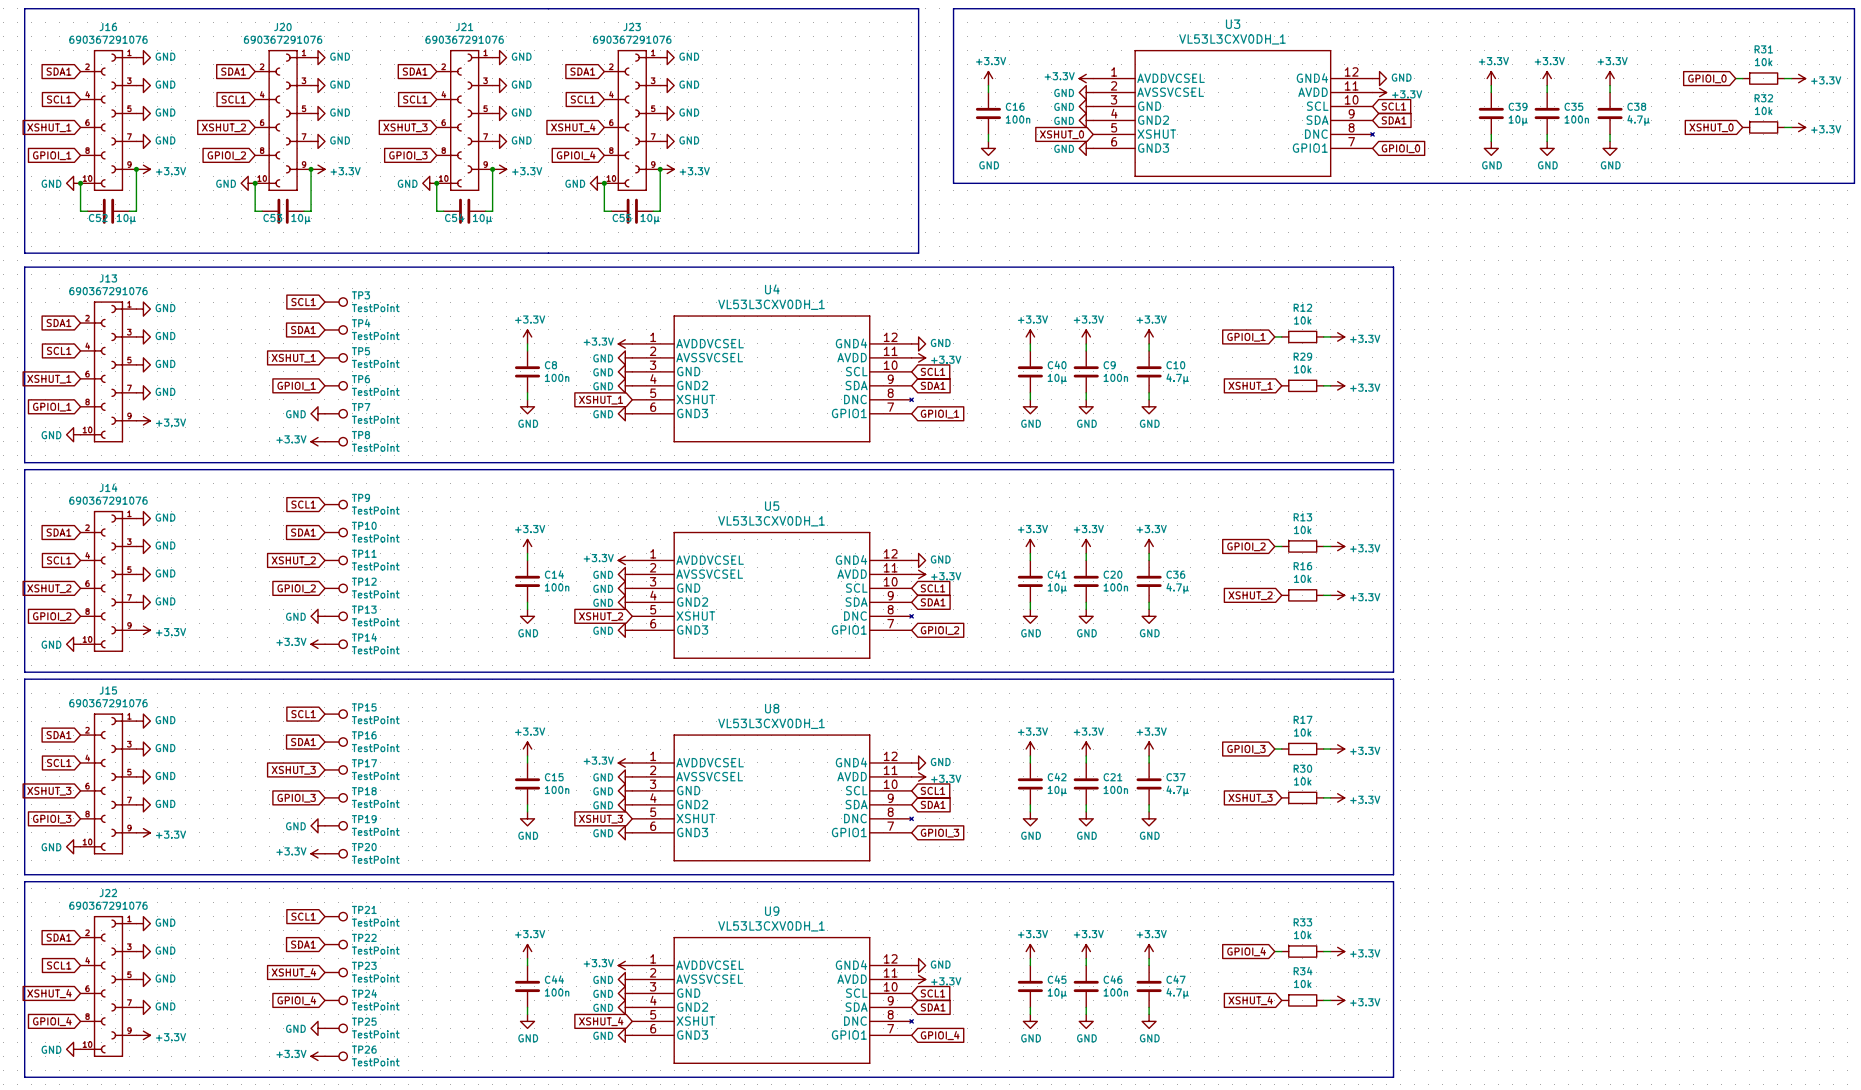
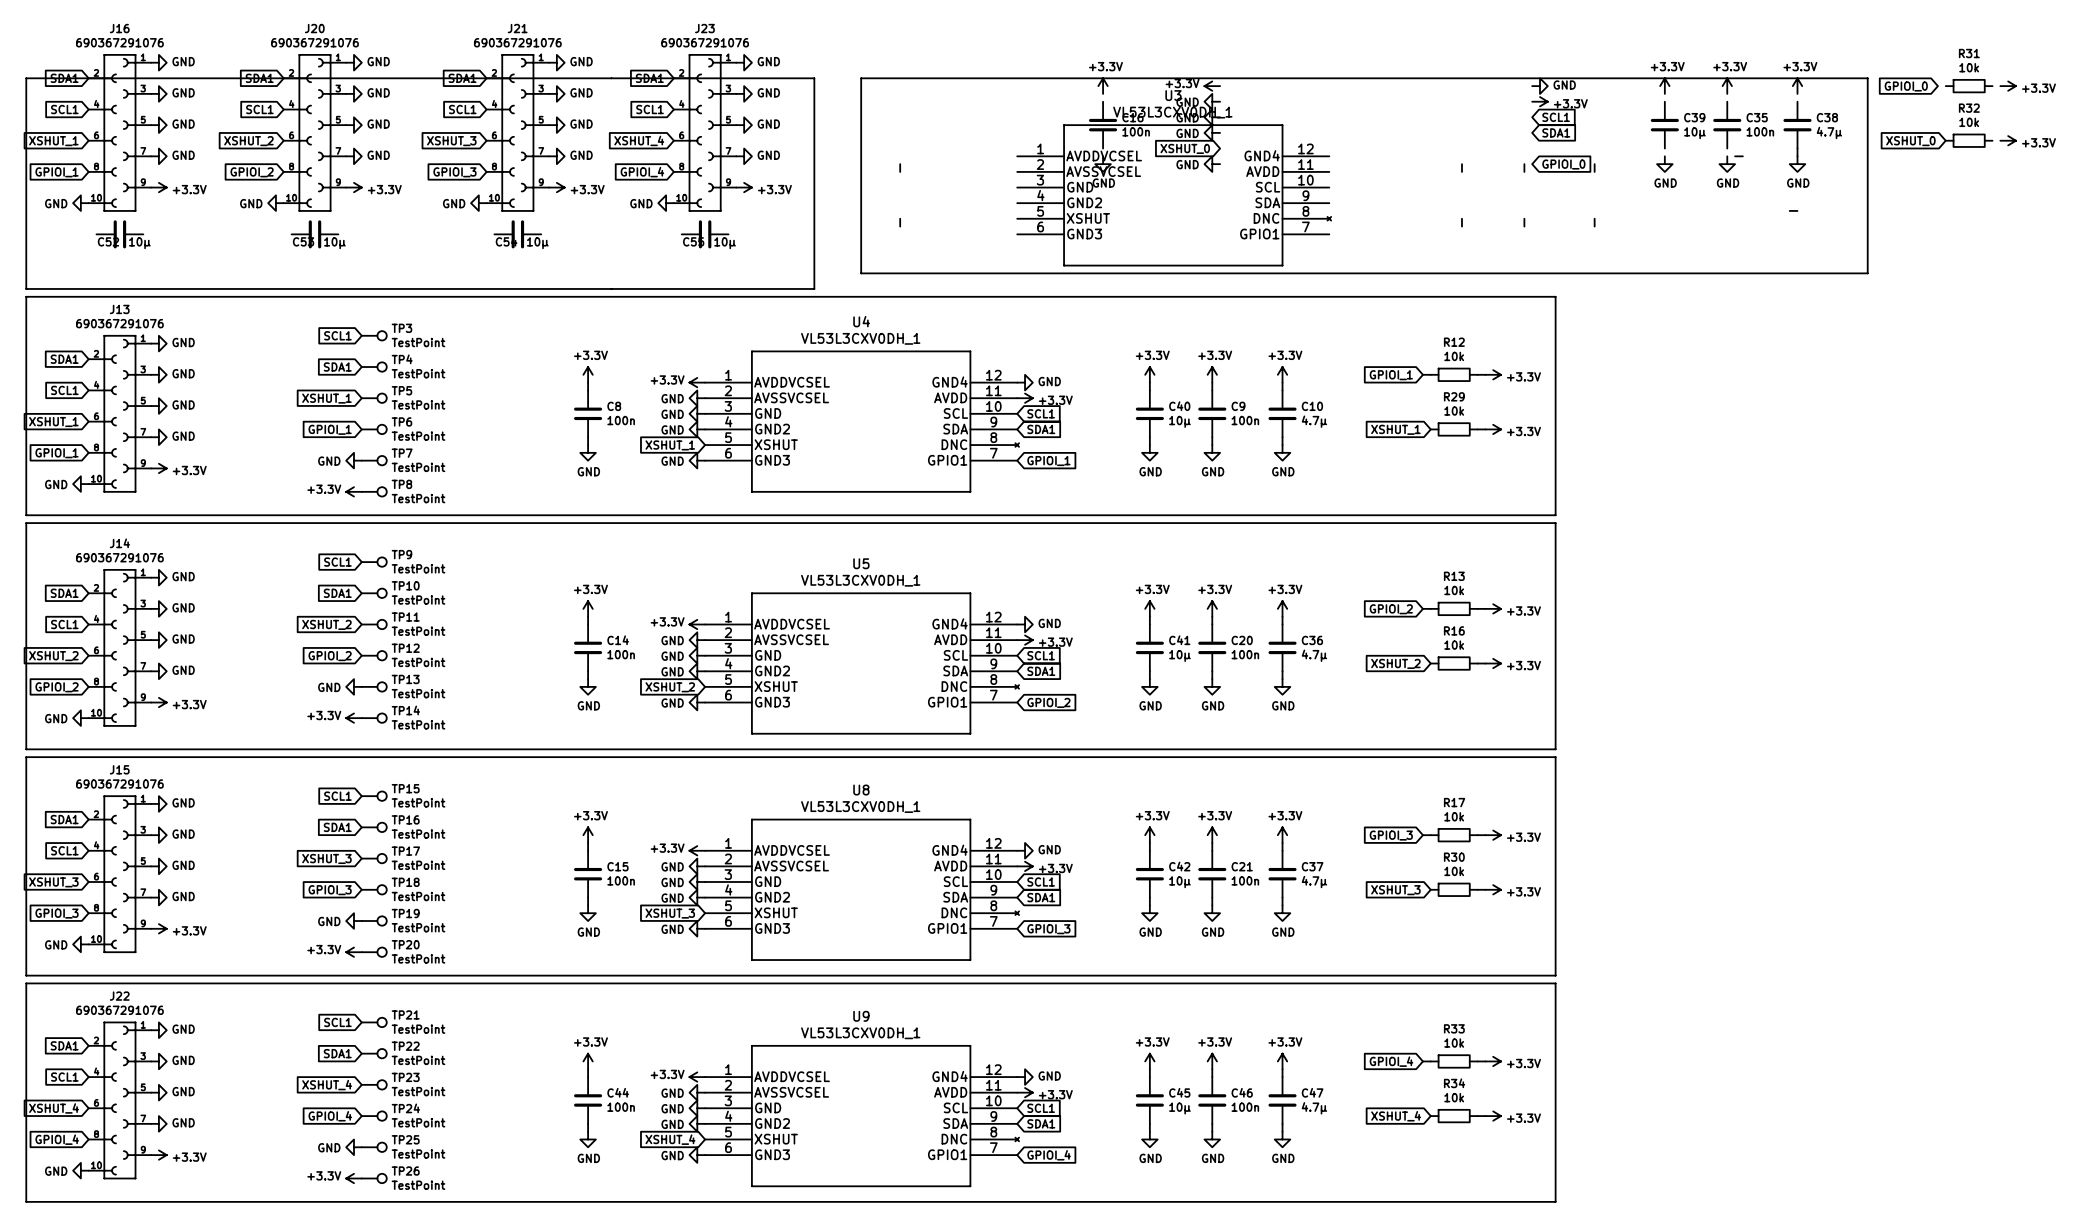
line: (953, 8) (1854, 8) (1854, 183) (953, 183) (953, 8) -> none
line: (24, 71) (24, 8) (918, 8) (918, 253) (24, 253) -> (26, 78) (814, 78) (814, 288) (26, 288) (26, 281)
line: none -> (861, 78) (1867, 78) (1867, 273) (861, 273) (861, 78)
wire: (1735, 78) (1742, 78) -> none
wire: (1784, 78) (1791, 78) -> none
wire: (988, 85) (988, 92) -> none
wire: (1491, 85) (1491, 92) -> (1594, 164) (1594, 171)
wire: (1547, 85) (1547, 92) -> none
wire: (1610, 85) (1610, 92) -> none
U3 position: (1233, 113) -> (1174, 195)
wire: (1784, 127) (1791, 127) -> none
wire: (988, 134) (988, 141) -> none
wire: (1491, 134) (1491, 141) -> (1594, 218) (1594, 226)
wire: (1547, 134) (1547, 141) -> none
wire: none -> (1735, 156) (1742, 156)
wire: none -> (900, 164) (900, 171)
wire: none -> (1461, 164) (1461, 171)
wire: none -> (1524, 164) (1524, 171)
wire: (136, 169) (136, 211) (129, 211) -> none
junction: (136, 169) -> none
wire: (311, 169) (311, 211) (304, 211) -> none
junction: (311, 169) -> none
wire: (492, 169) (492, 211) (485, 211) -> none
junction: (492, 169) -> none
wire: (660, 169) (660, 211) (653, 211) -> none
junction: (660, 169) -> none
wire: (80, 183) (80, 211) (87, 211) -> none
junction: (80, 183) -> none
wire: (255, 183) (255, 211) (262, 211) -> none
junction: (255, 183) -> none
wire: (436, 183) (436, 211) (443, 211) -> none
junction: (436, 183) -> none
wire: (604, 183) (604, 211) (611, 211) -> none
junction: (604, 183) -> none
wire: none -> (1789, 210) (1797, 210)
wire: none -> (900, 218) (900, 226)
wire: none -> (1461, 218) (1461, 226)
wire: none -> (1524, 218) (1524, 226)

